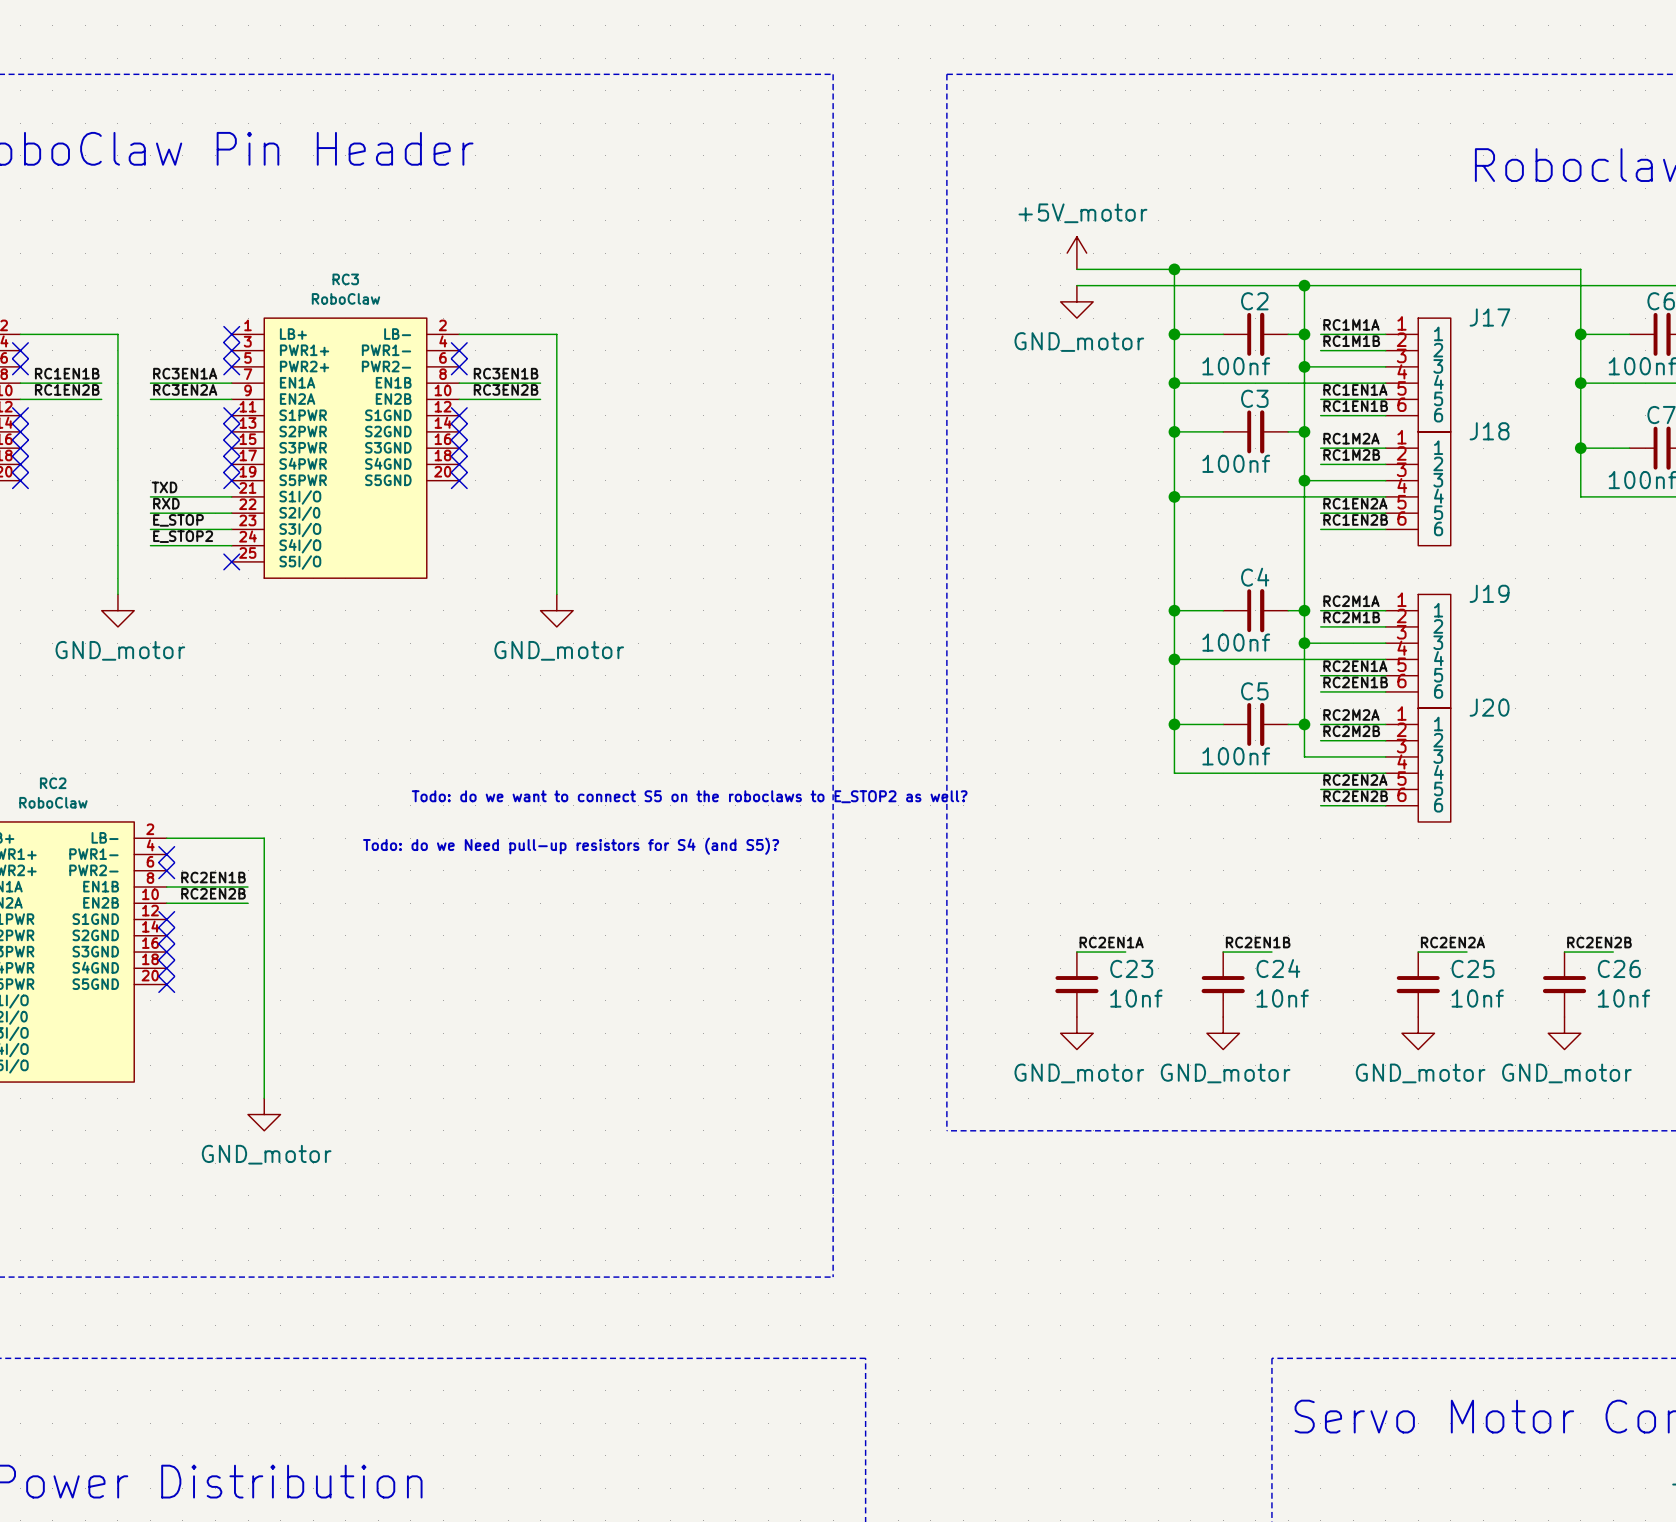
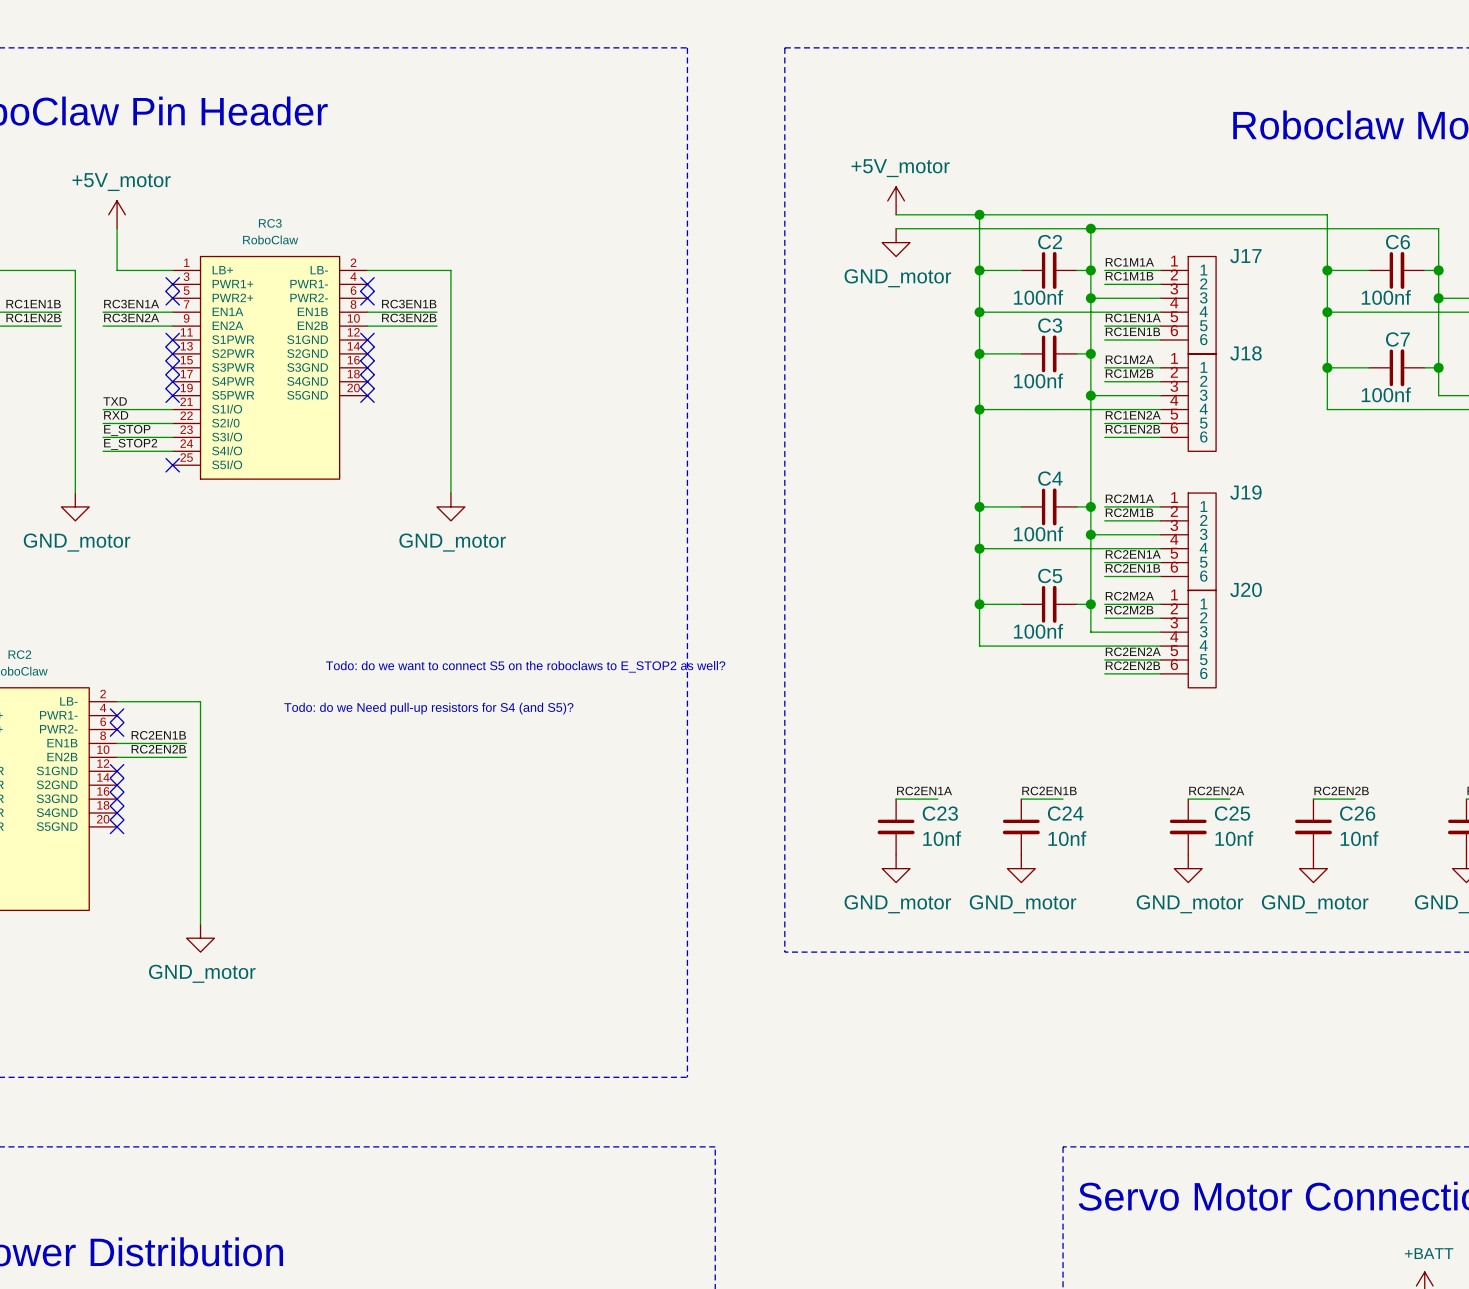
power symbol: none -> +5V_motor (117, 214)
wire: none -> (117, 228) (117, 270) (172, 270)
no-connect mark: (231, 334) -> none

